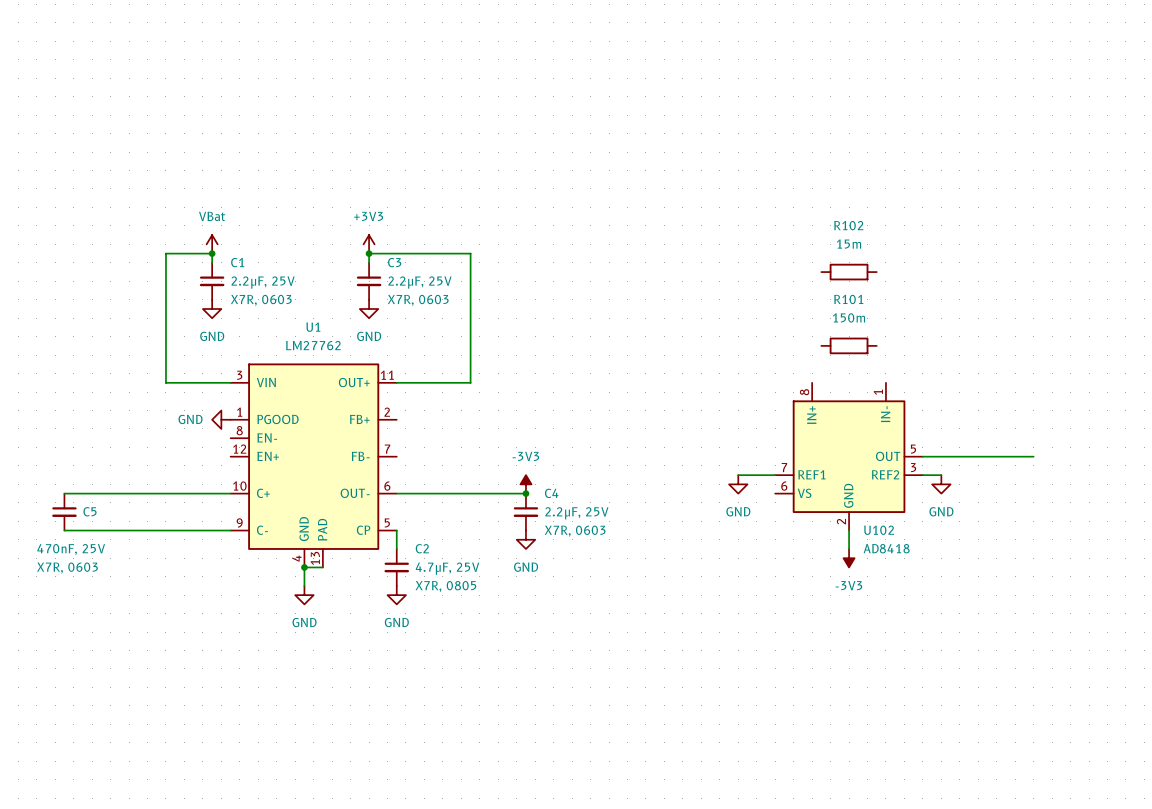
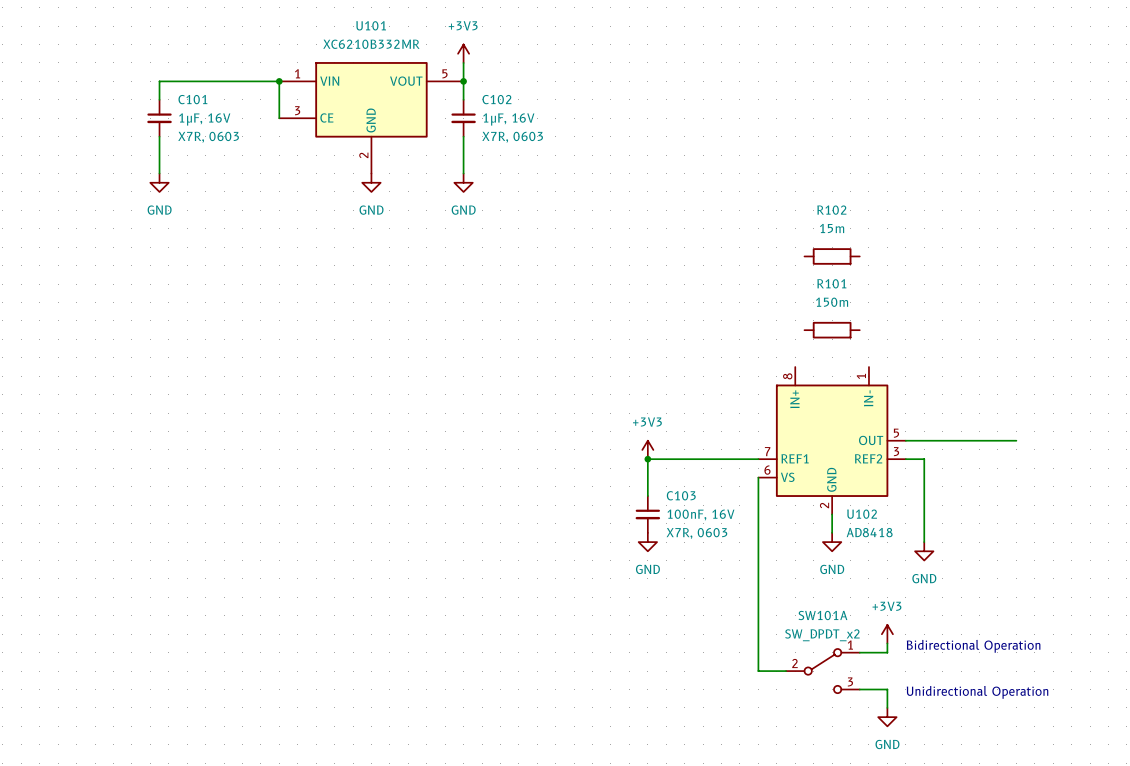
power symbol: none -> +3V3 (463, 53)
wire: none -> (463, 62) (463, 99)
junction: none -> (279, 81)
junction: none -> (463, 81)
wire: none -> (159, 99) (159, 81) (279, 81) (279, 118)
C101: none -> (159, 118)
U101: none -> XC6210B332MR (371, 117)
C102: none -> (463, 118)
wire: none -> (159, 136) (159, 173)
wire: none -> (463, 136) (463, 173)
power symbol: none -> GND (159, 182)
power symbol: none -> GND (371, 182)
power symbol: none -> GND (463, 182)
power symbol: VBat (212, 244) -> none
power symbol: +3V3 (369, 244) -> none
junction: (212, 253) -> none
junction: (369, 253) -> none
wire: (212, 262) (212, 253) (165, 253) (165, 382) (230, 382) -> none
wire: (369, 262) (369, 253) (470, 253) (470, 382) (396, 382) -> none
C1: (212, 281) -> none
C3: (369, 281) -> none
power symbol: GND (212, 308) -> none
power symbol: GND (369, 308) -> none
power symbol: GND (221, 419) -> none
U1: LM27762 (313, 465) -> none
power symbol: none -> +3V3 (647, 449)
junction: none -> (647, 459)
wire: none -> (721, 459) (647, 459) (647, 496)
wire: none -> (924, 459) (924, 542)
power symbol: -3V3 (525, 484) -> none
power symbol: GND (738, 484) -> none
power symbol position: GND (941, 484) -> GND (924, 551)
wire: (64, 493) (230, 493) -> none
wire: (396, 493) (525, 493) -> none
junction: (525, 493) -> none
wire: none -> (758, 477) (758, 671) (786, 671)
C5: (64, 512) -> none
C4: (525, 512) -> none
wire: (64, 530) (230, 530) -> none
wire: (396, 530) (396, 548) -> none
C103: none -> (647, 514)
power symbol: GND (525, 539) -> none
power symbol: none -> GND (647, 542)
power symbol: -3V3 (849, 558) -> GND (832, 542)
junction: (304, 567) -> none
wire: (322, 567) (304, 567) (304, 585) -> none
C2: (396, 567) -> none
power symbol: GND (304, 595) -> none
power symbol: GND (396, 595) -> none
power symbol: none -> +3V3 (887, 634)
wire: none -> (887, 643) (887, 652) (859, 652)
text: none -> Bidirectional Operation (973, 646)
SW101A: none -> SW_DPDT_x2 (822, 671)
wire: none -> (859, 689) (887, 689) (887, 707)
text: none -> Unidirectional Operation (977, 692)
power symbol: none -> GND (887, 717)

